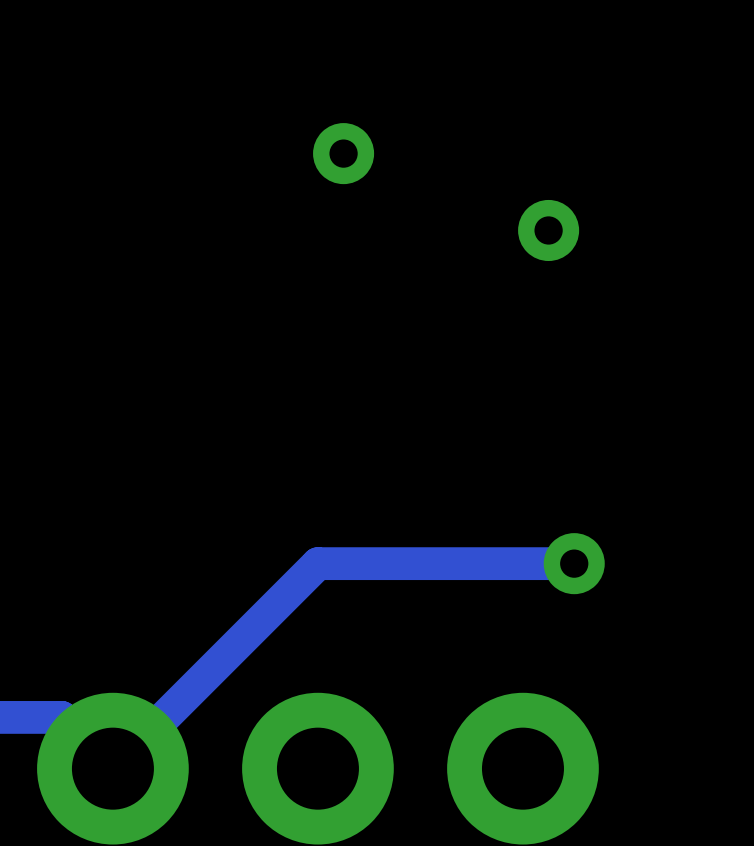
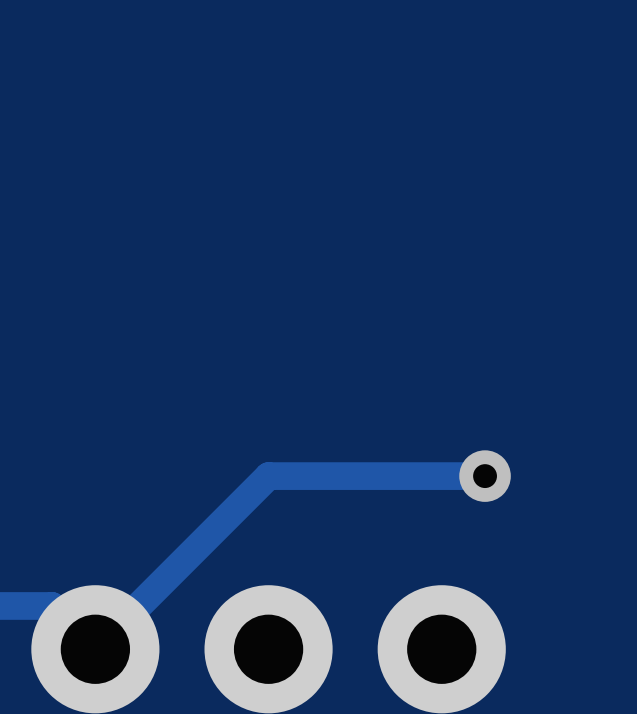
via: (343, 153) -> none
via: (548, 230) -> none

